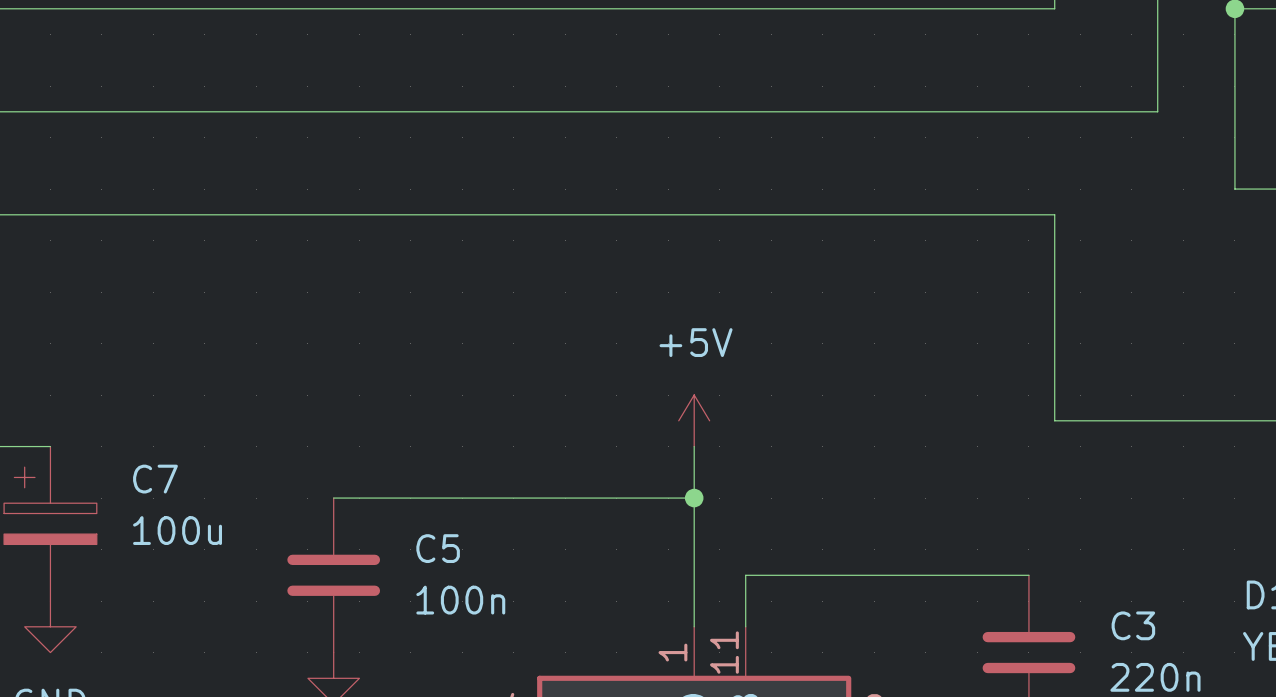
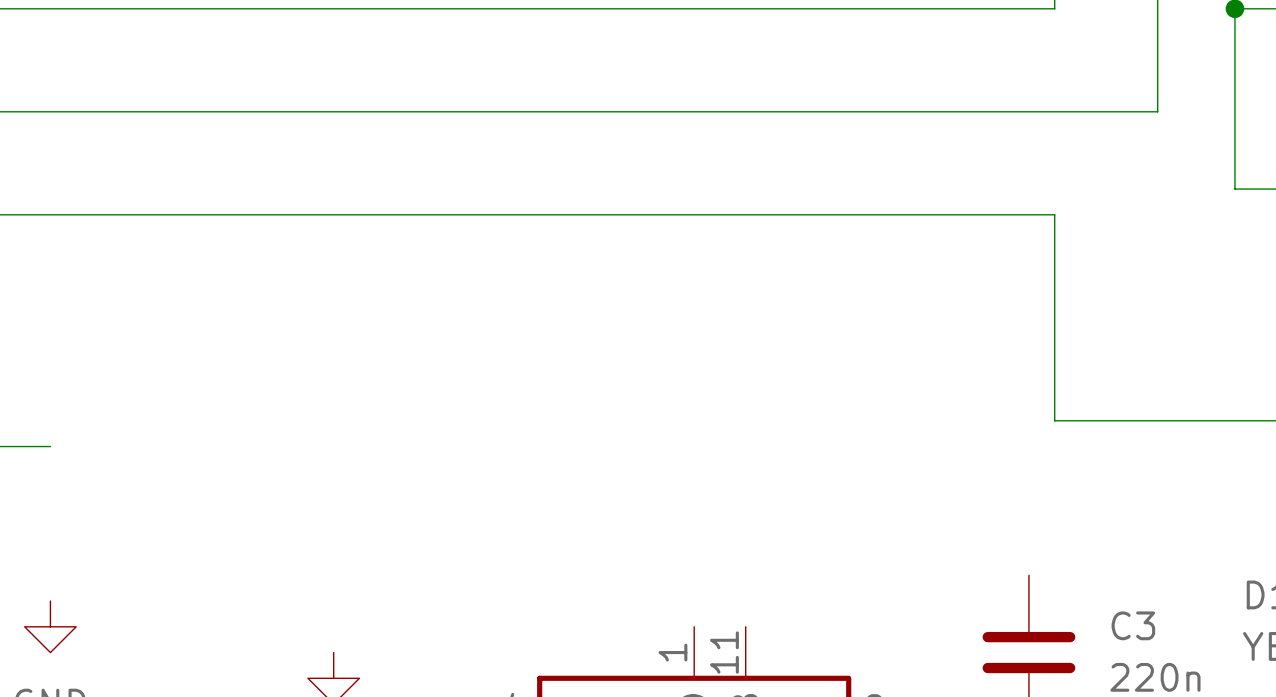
power symbol: +5V (694, 420) -> none
wire: (694, 446) (694, 626) -> none
wire: (333, 498) (694, 498) -> none
junction: (694, 498) -> none
C7: 100u (50, 523) -> none
C5: 100n (333, 575) -> none
wire: (1028, 575) (745, 575) (745, 626) -> none

